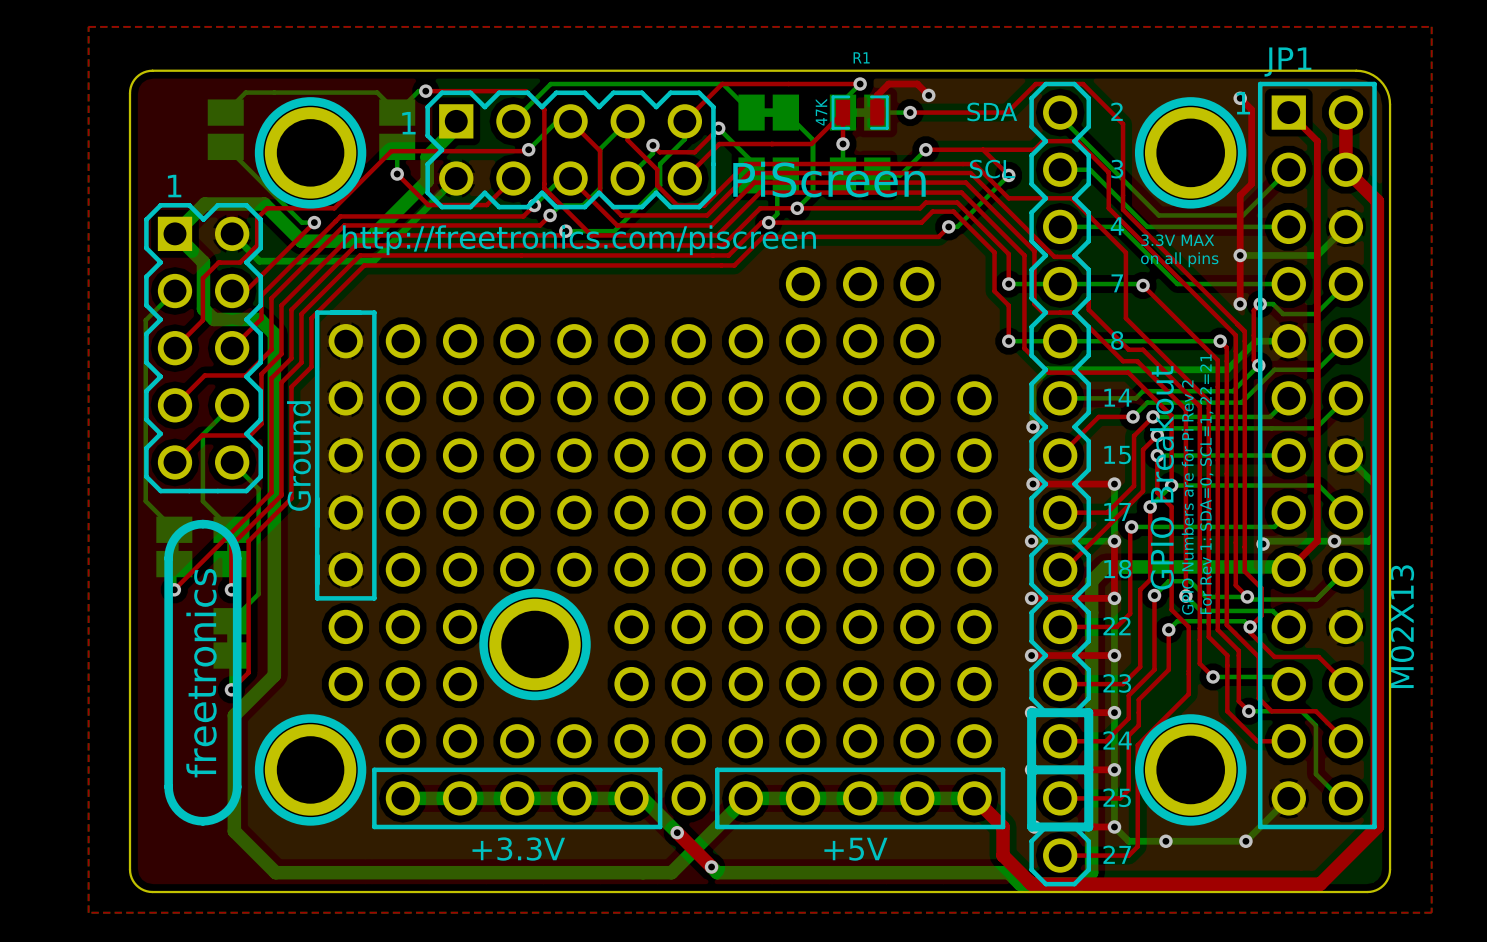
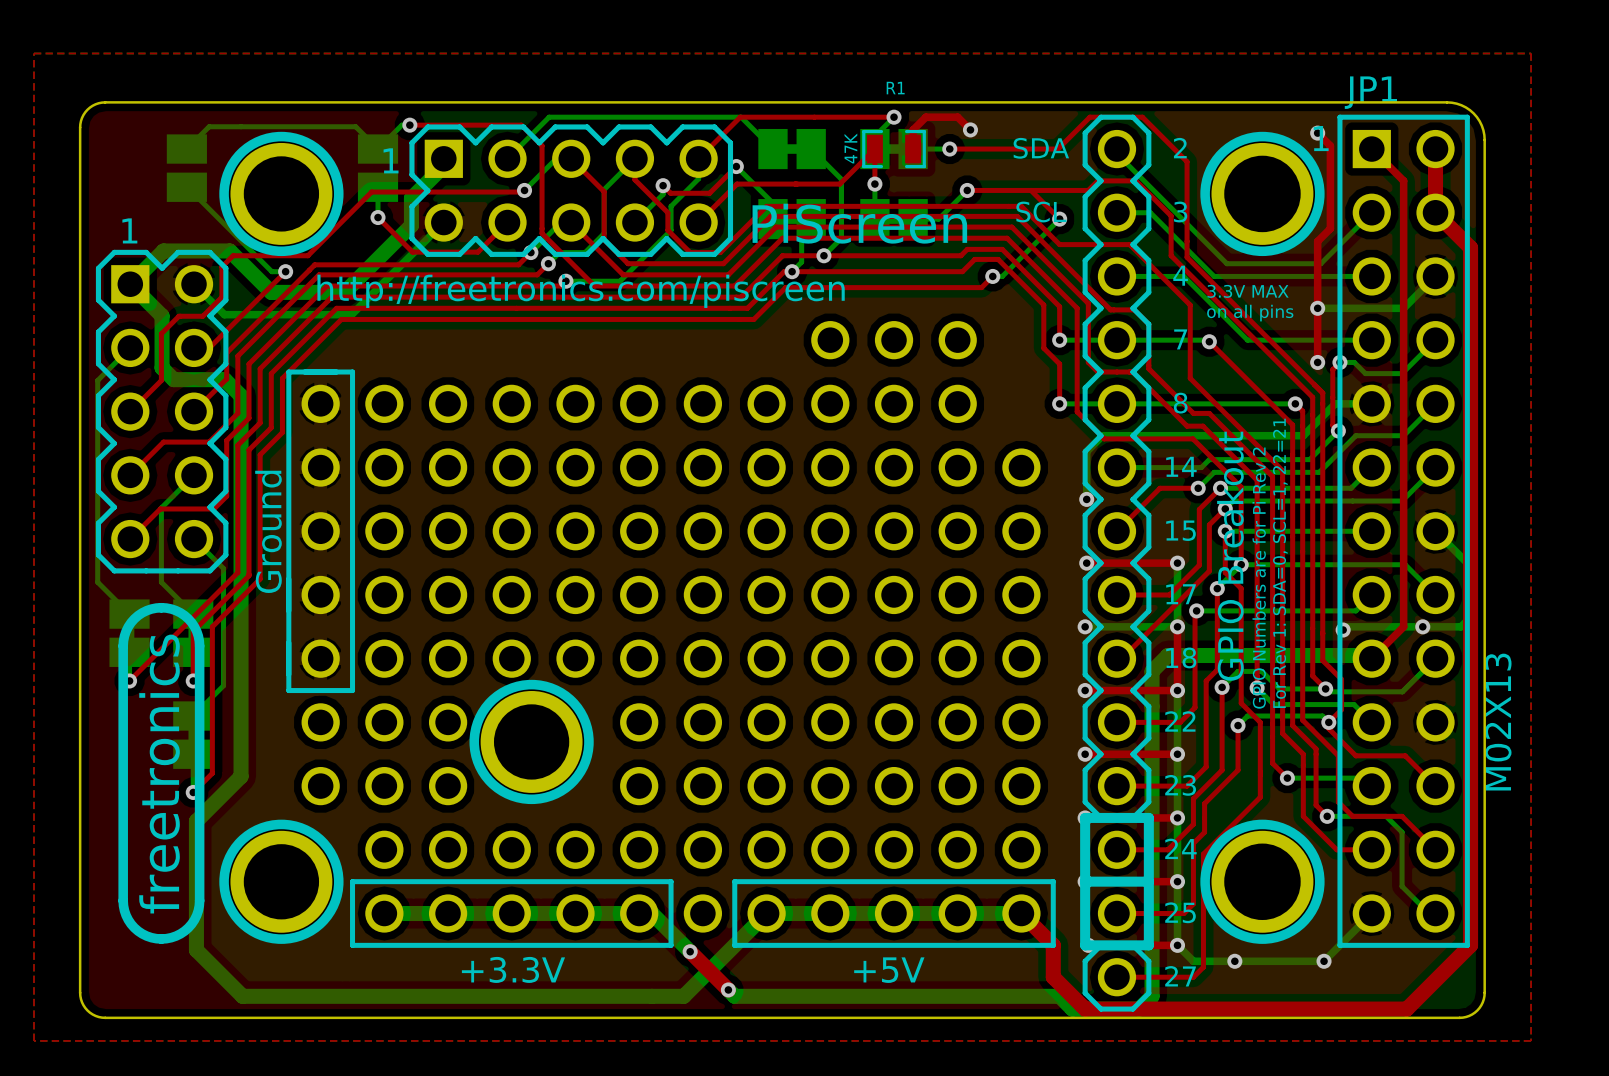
drawing shape: [164, 519, 242, 826] -> [118, 602, 205, 944]

